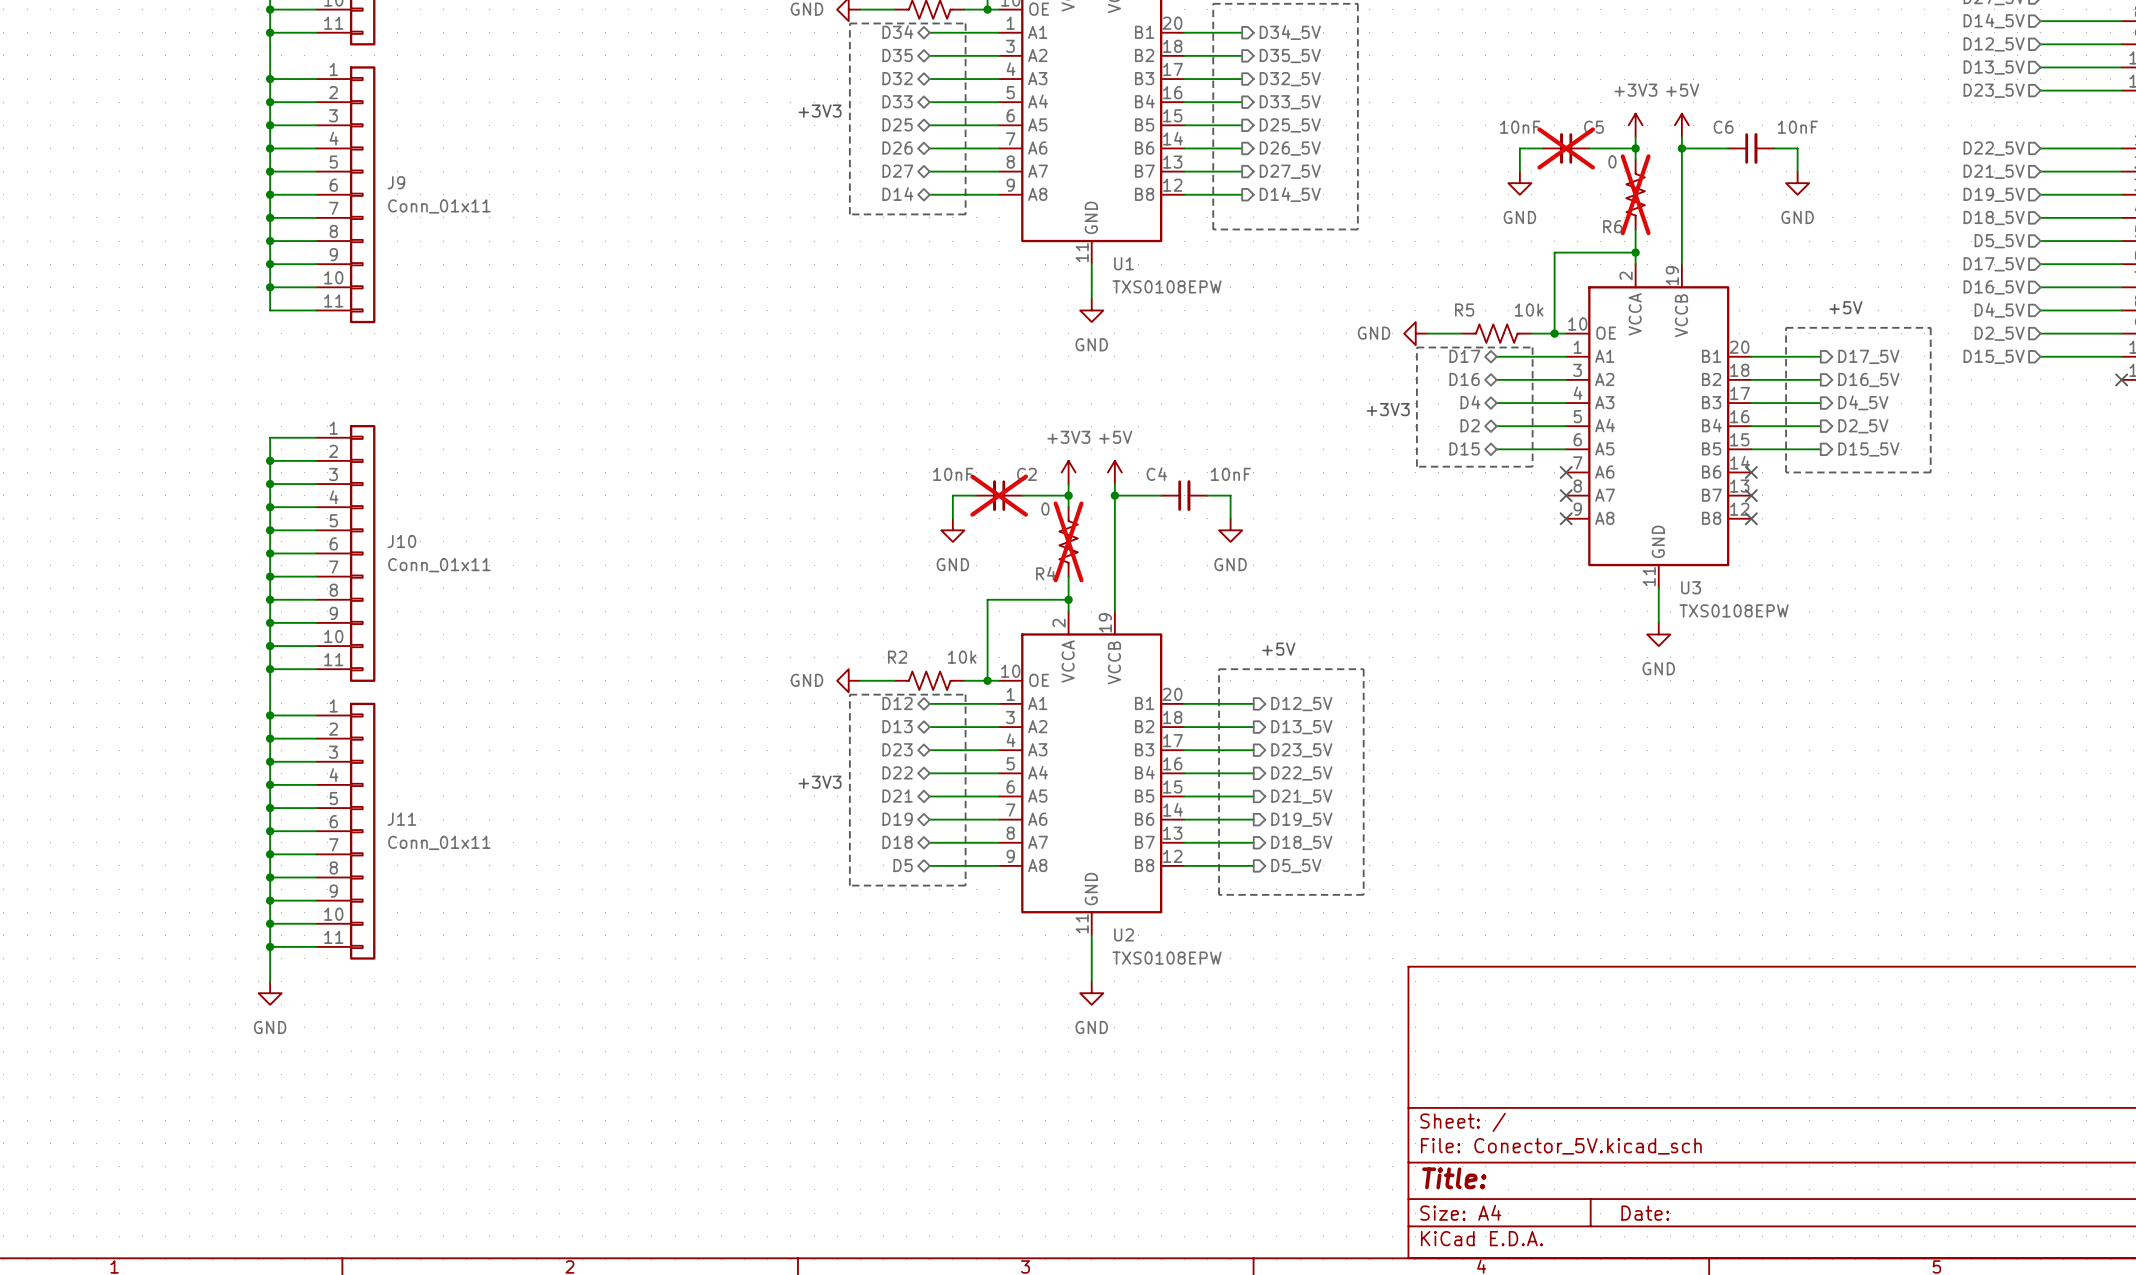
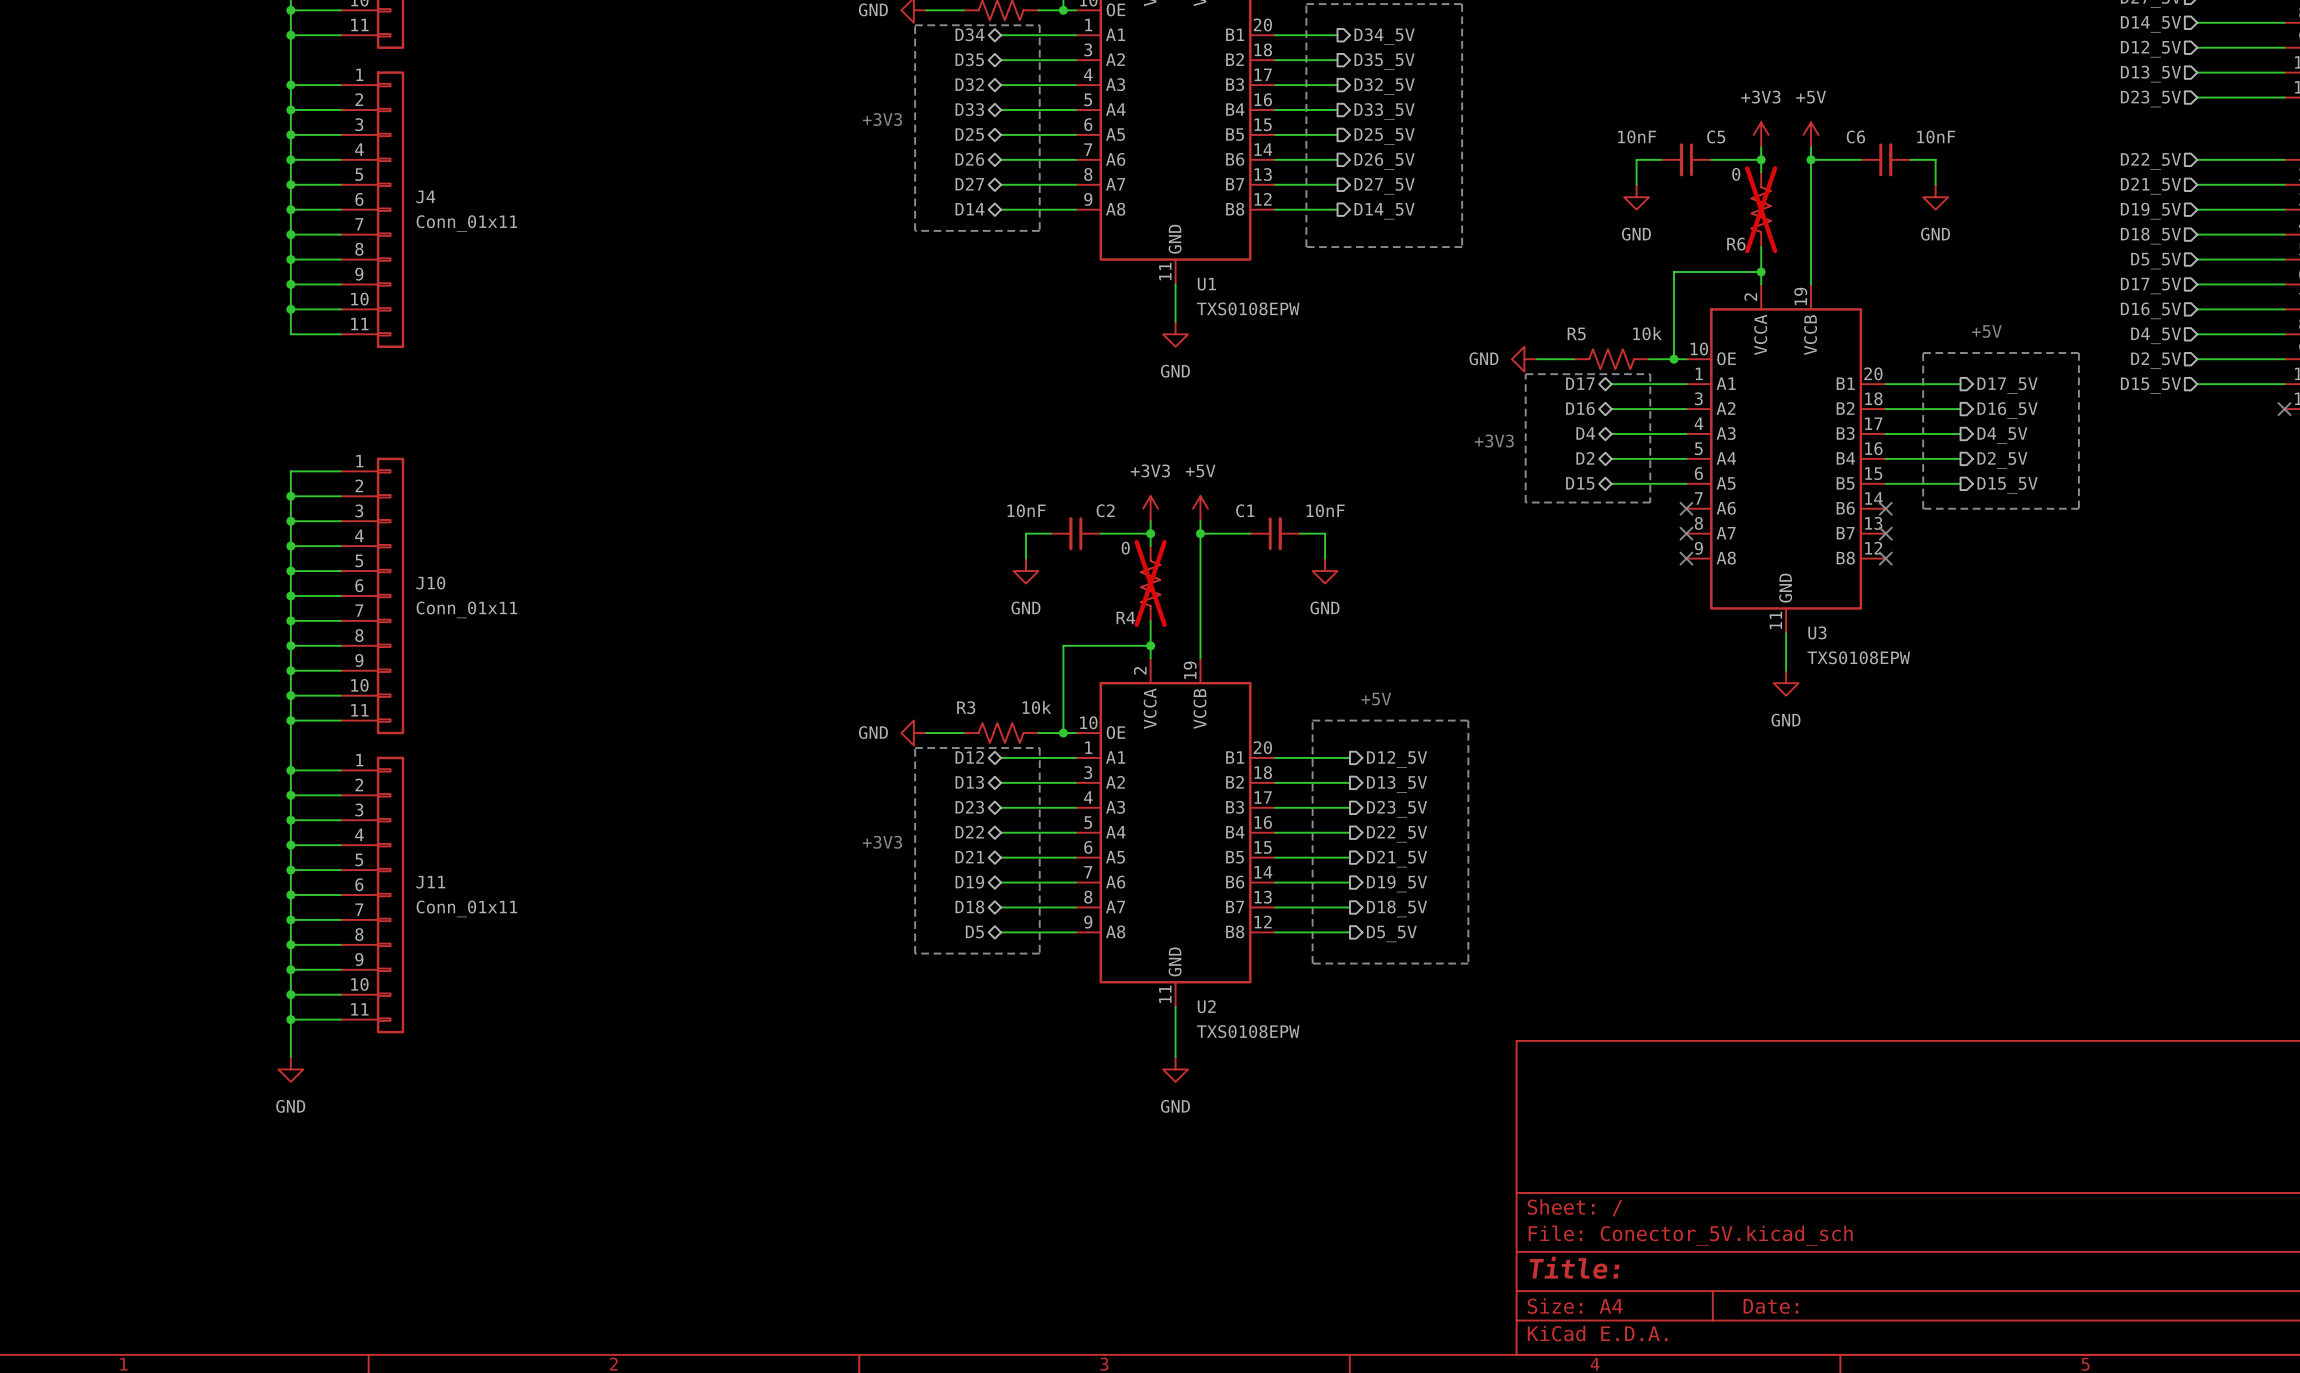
C5 do-not-place cross: (1566, 148) -> none
J9 name: J9 (396, 182) -> J4 (425, 196)
C4 name: C4 (1156, 474) -> C1 (1245, 510)
C2 do-not-place cross: (999, 495) -> none
R2 name: R2 (897, 657) -> R3 (966, 707)

